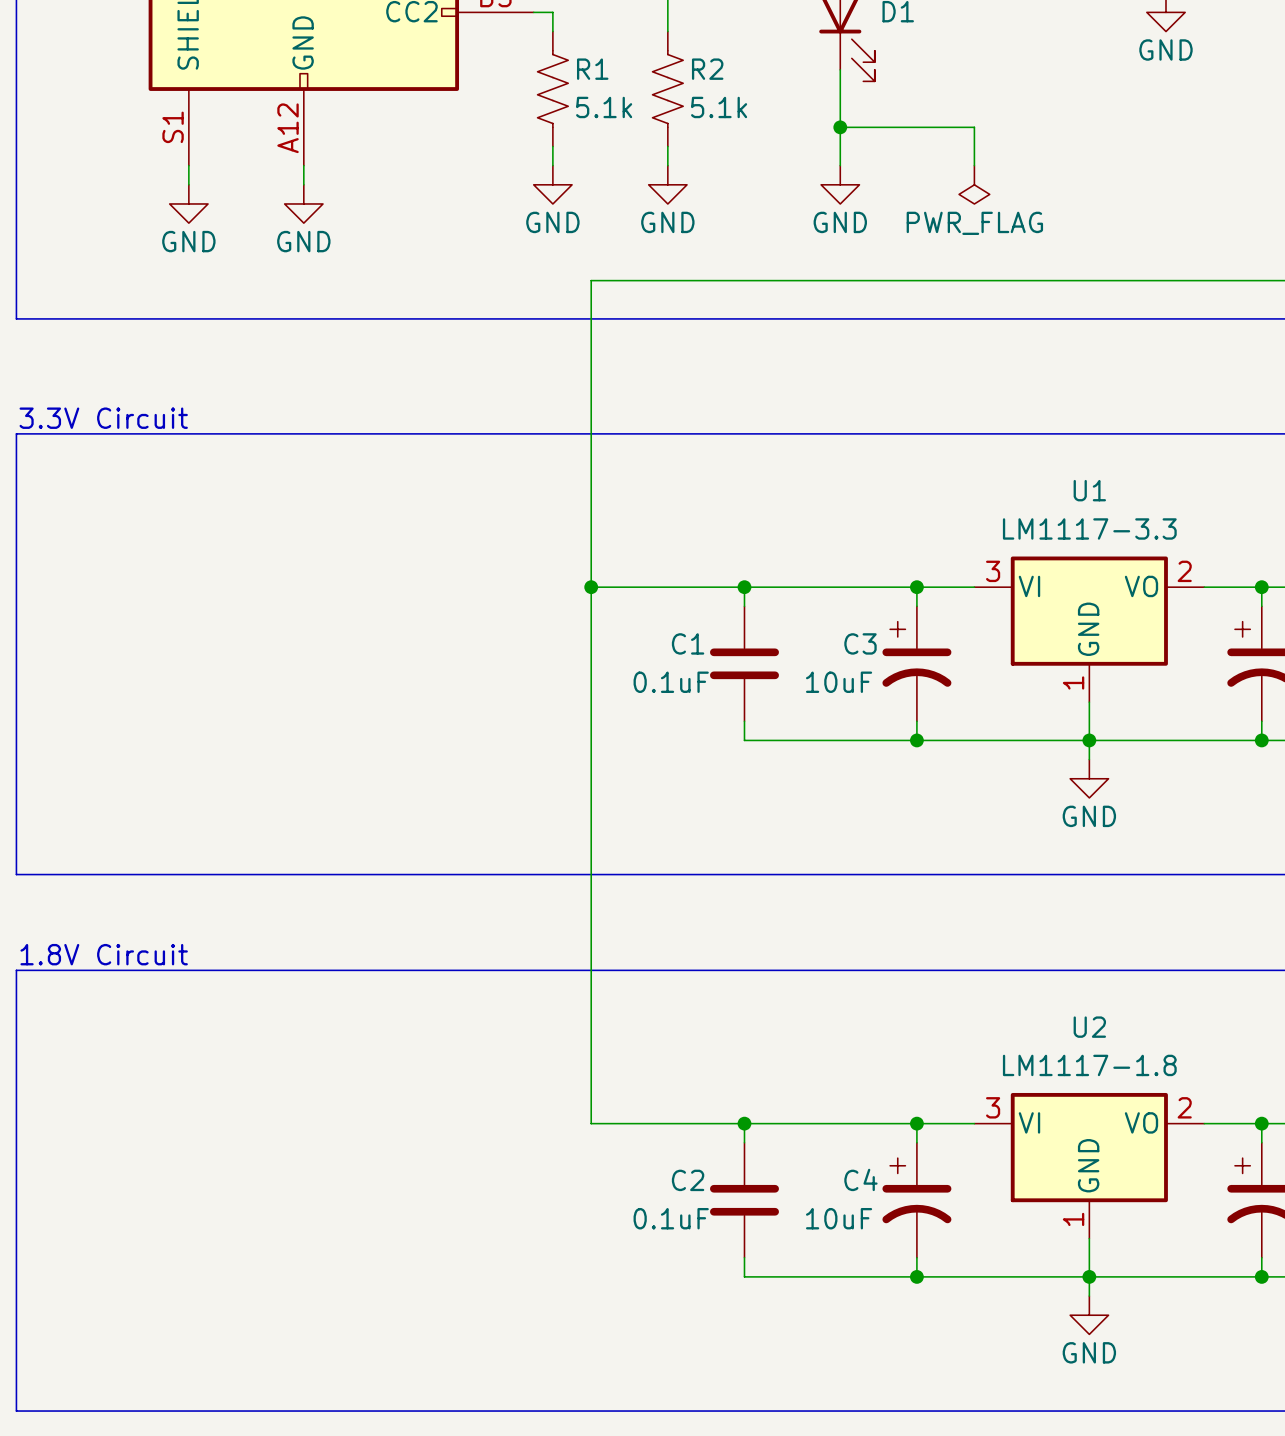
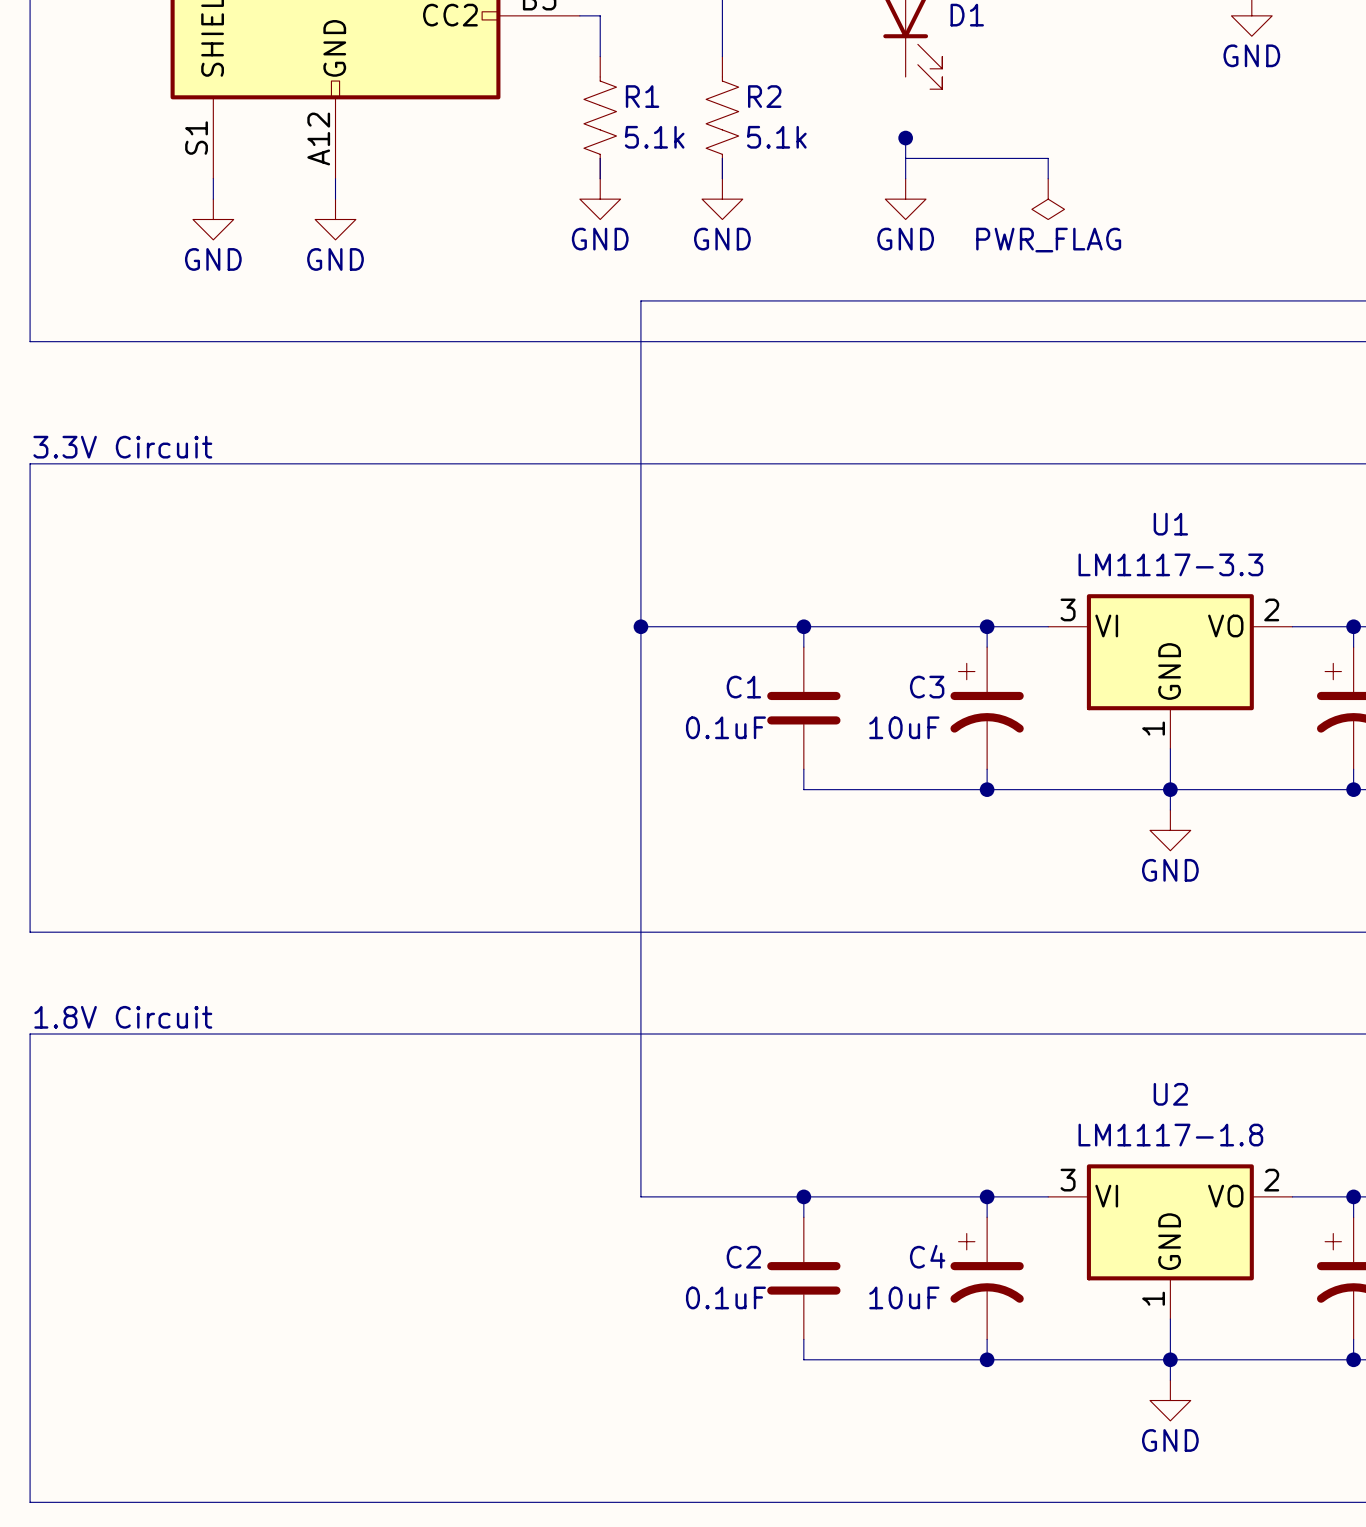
wire: (840, 69) (840, 127) (974, 127) (974, 146) -> (905, 158) (1048, 158)
R1 position: (552, 89) -> (600, 117)
R2 position: (667, 89) -> (722, 117)

